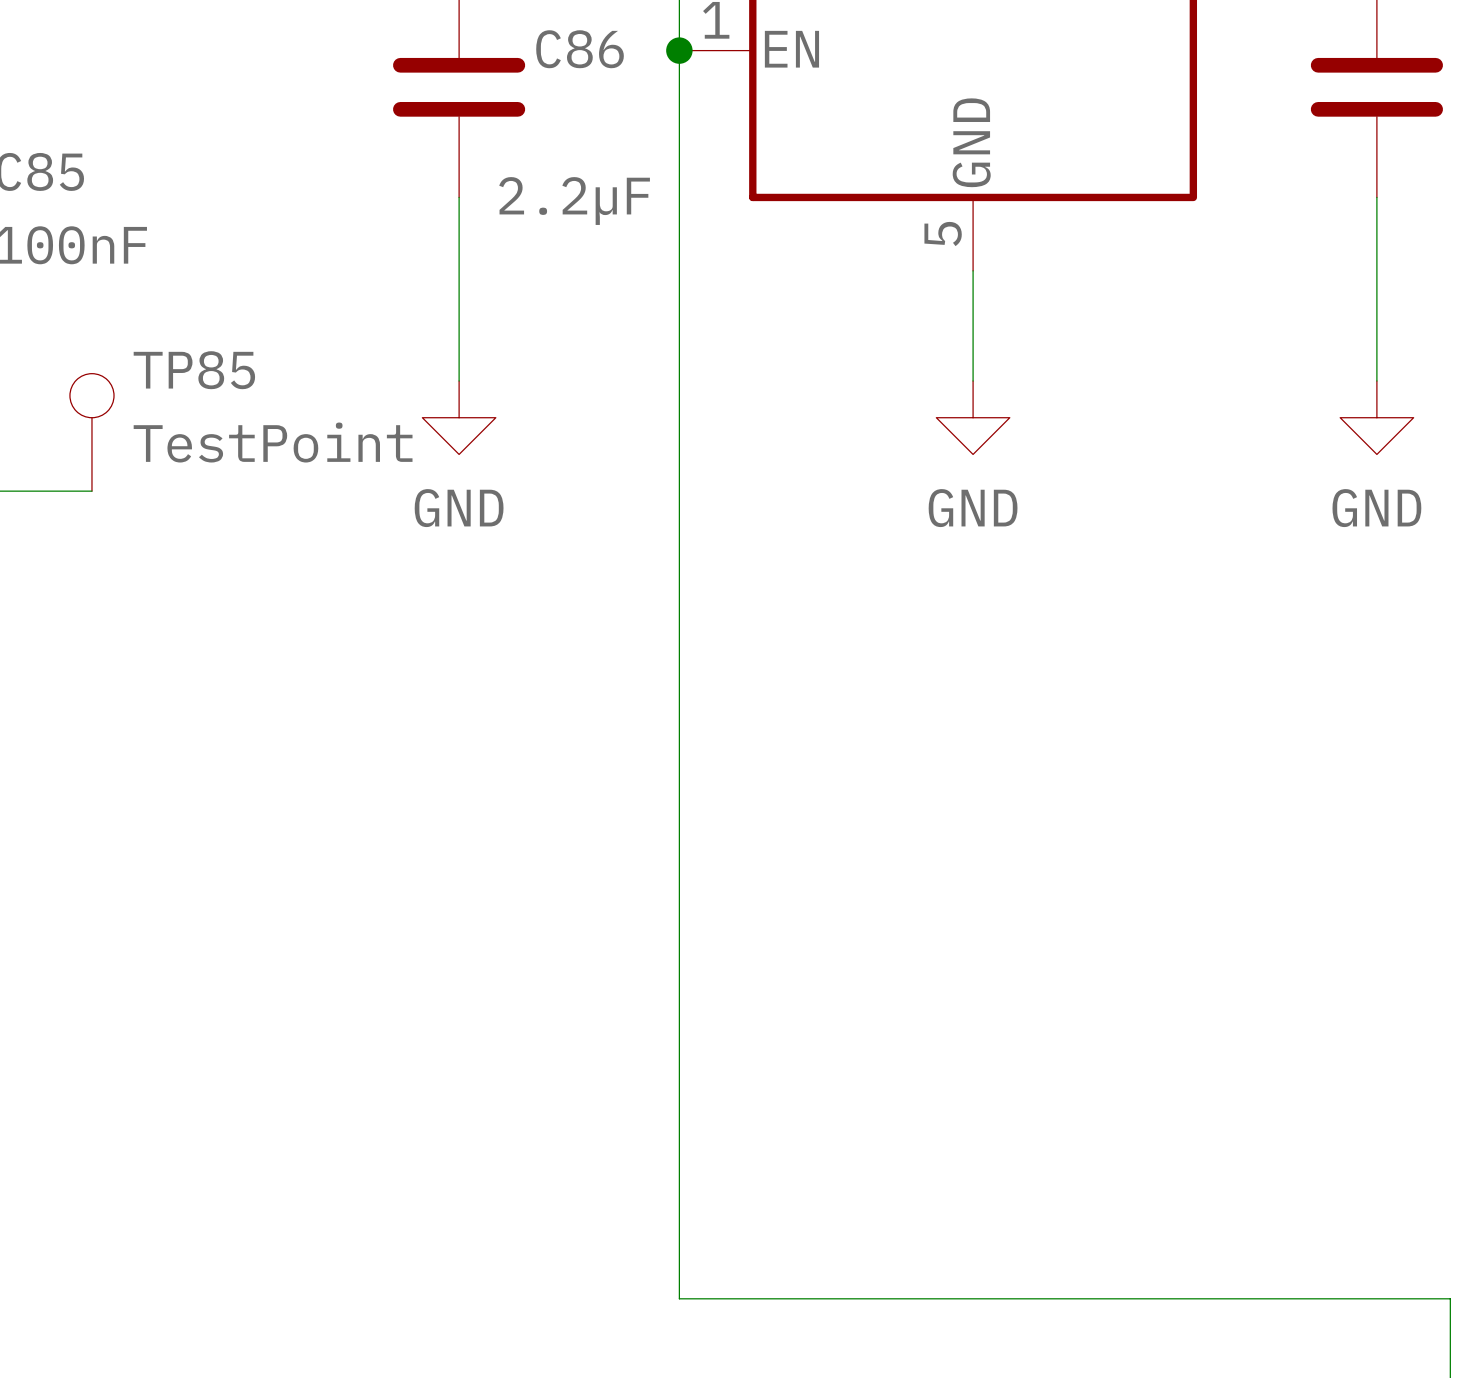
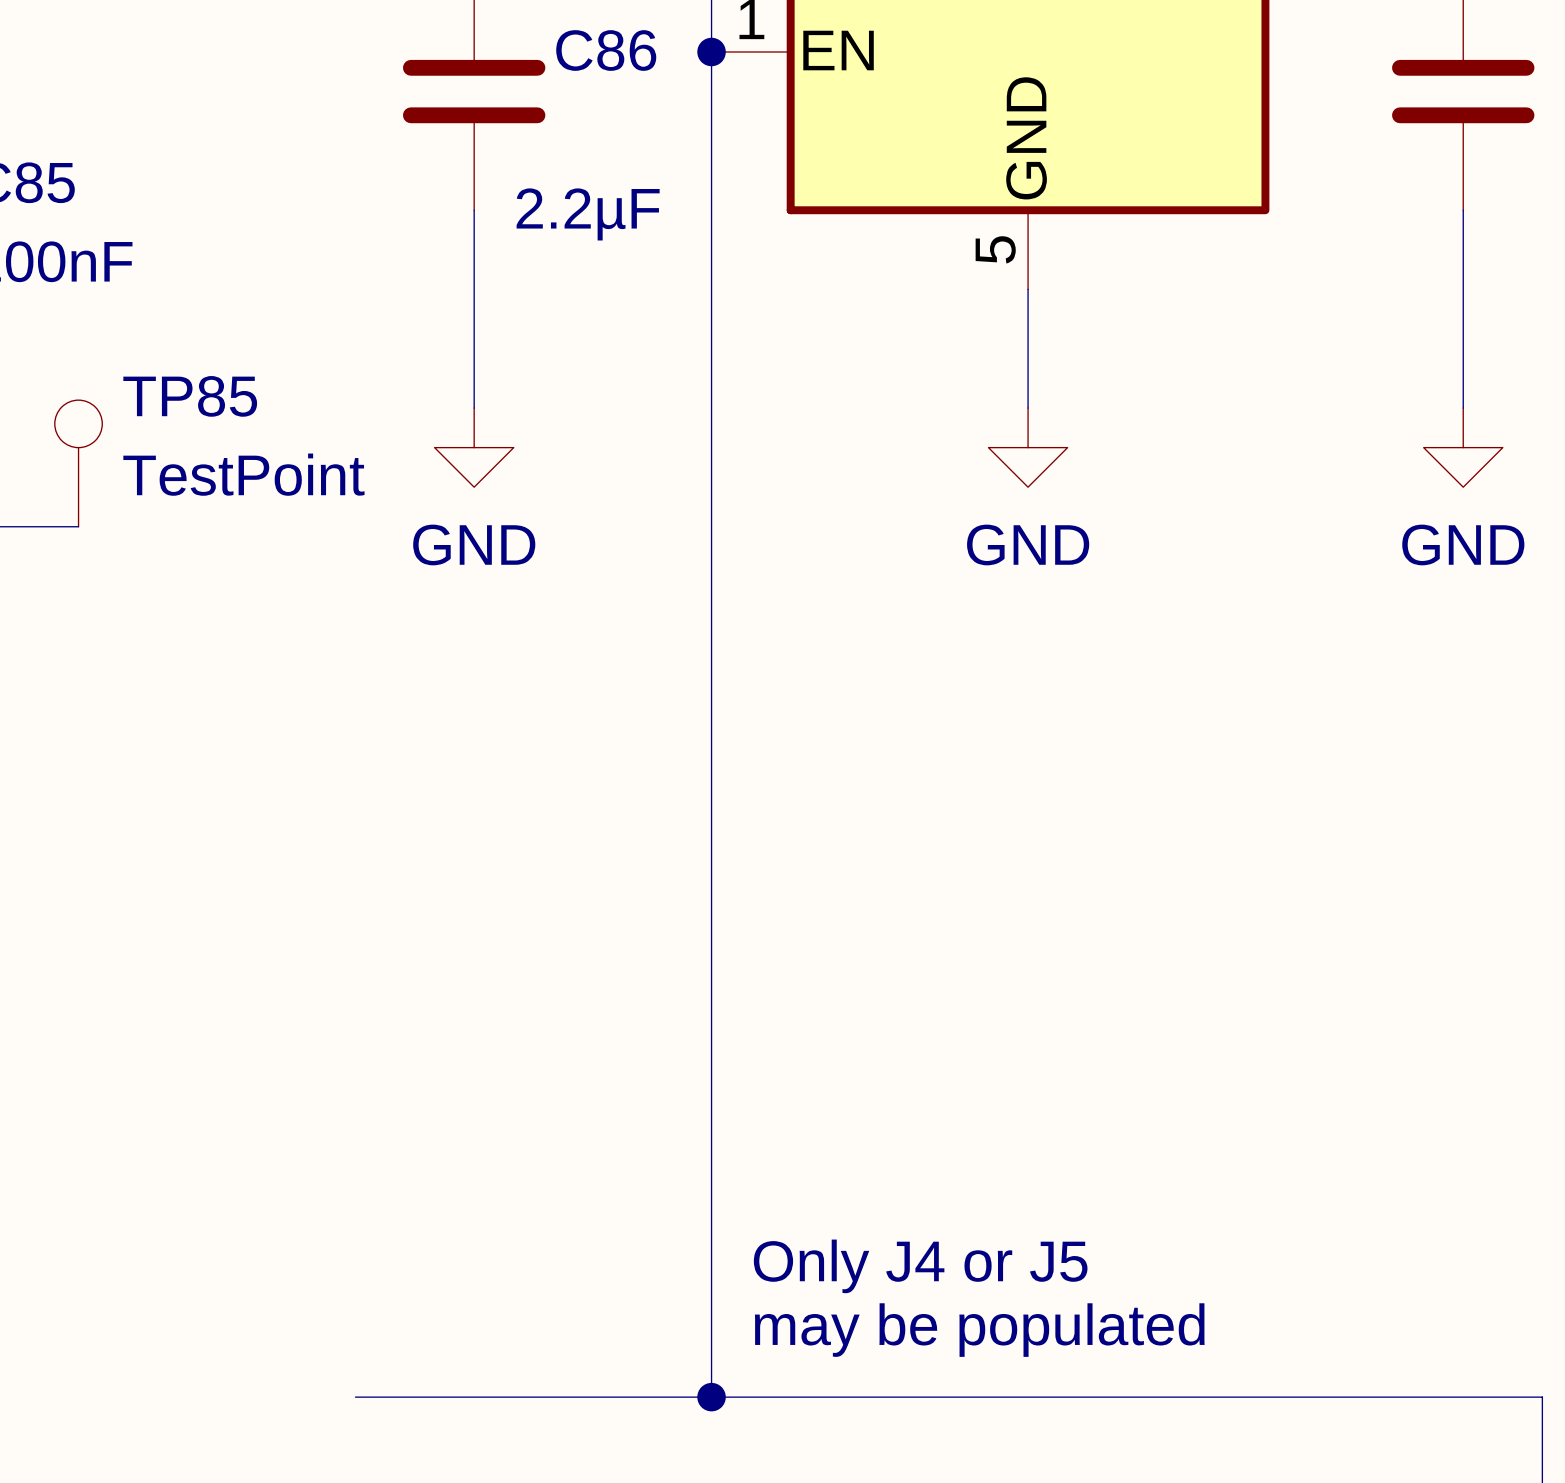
text: none -> Only J4 or J5 (920, 1266)
text: none -> may be populated (979, 1330)
wire: none -> (355, 1397) (711, 1397)
junction: none -> (711, 1397)

